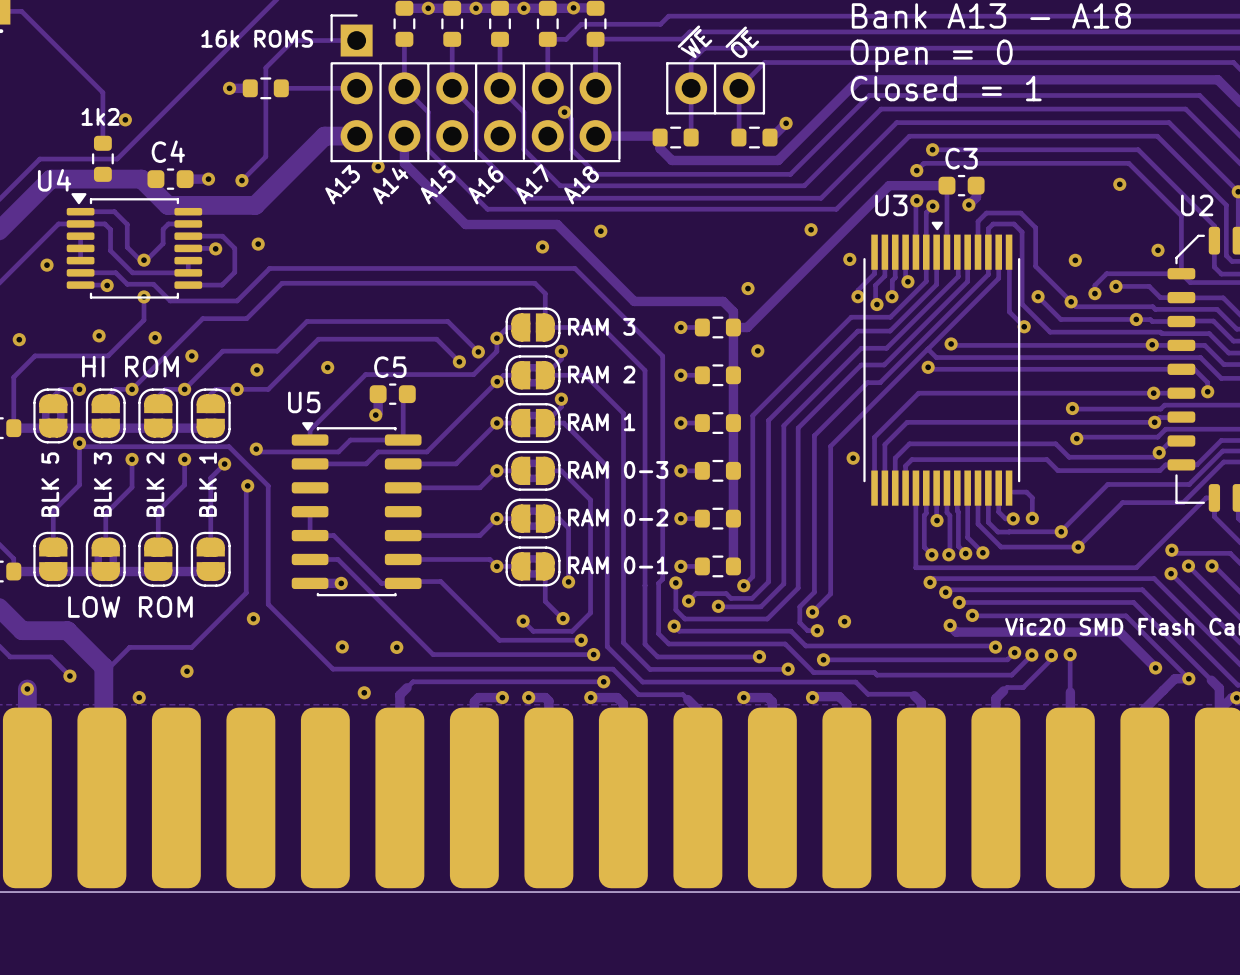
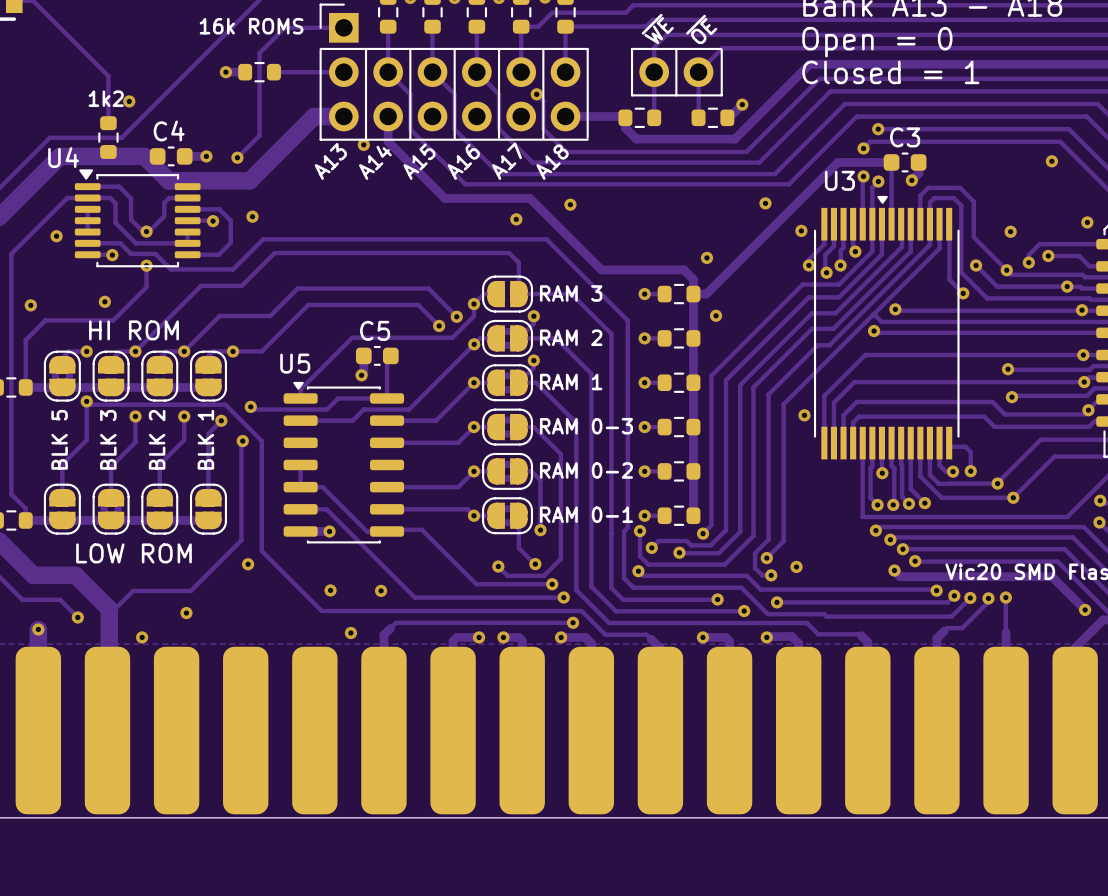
via: (155, 337) -> none
via: (191, 356) -> none
via: (327, 367) -> none
via: (256, 369) -> none

